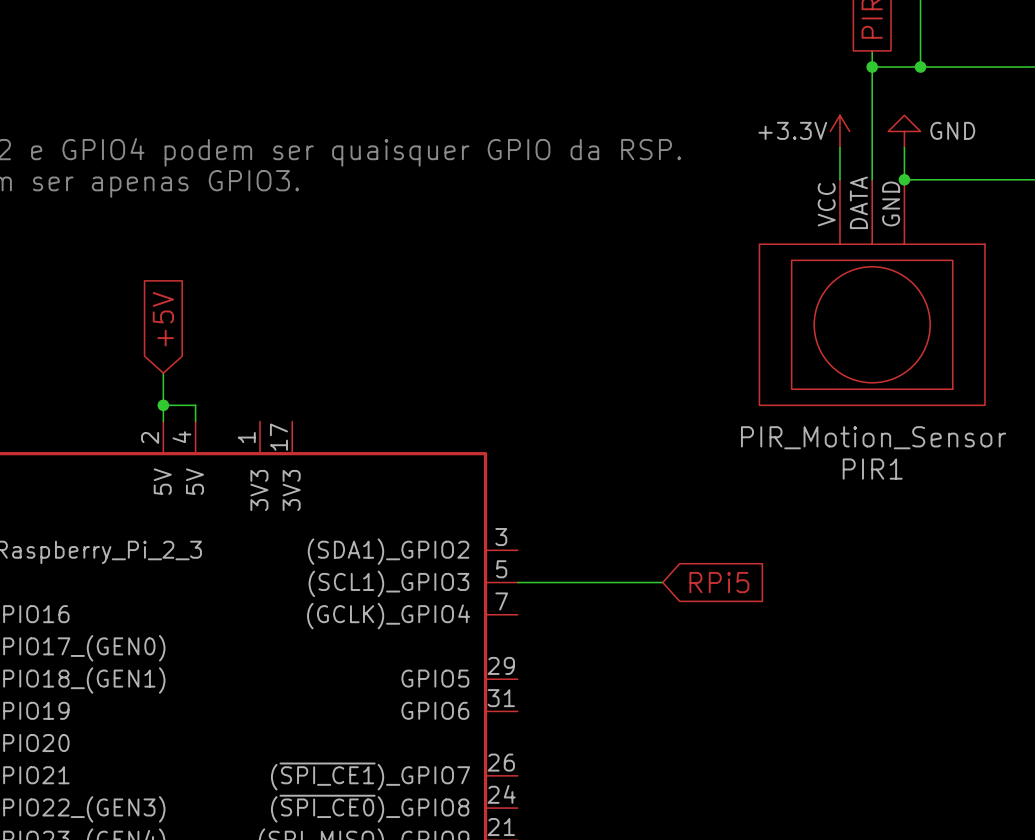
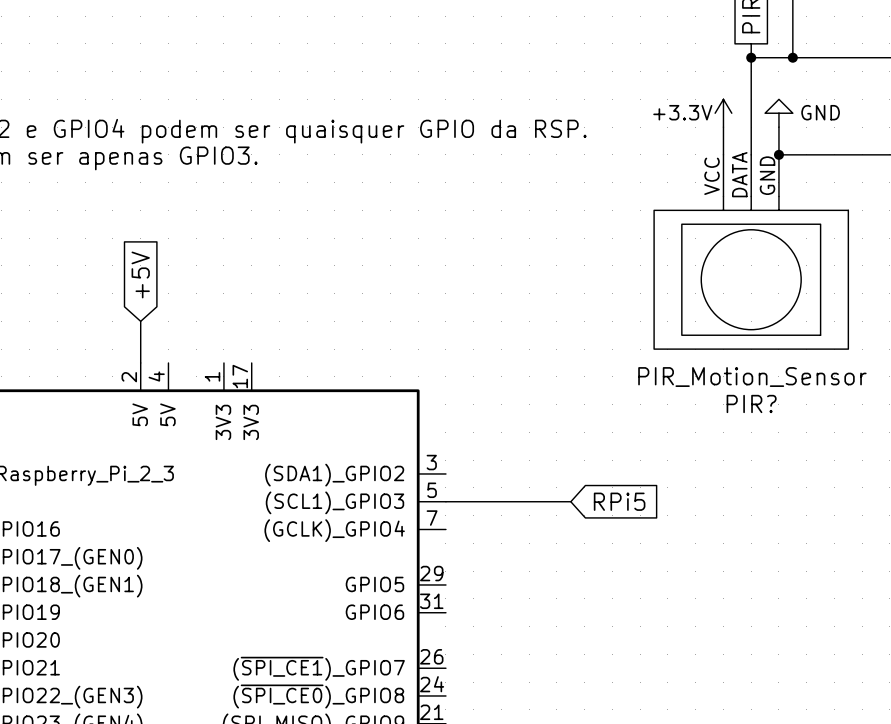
wire: (163, 405) (195, 405) (195, 421) -> none
junction: (163, 405) -> none
PIR1 name: PIR1 (872, 469) -> PIR? (751, 403)

